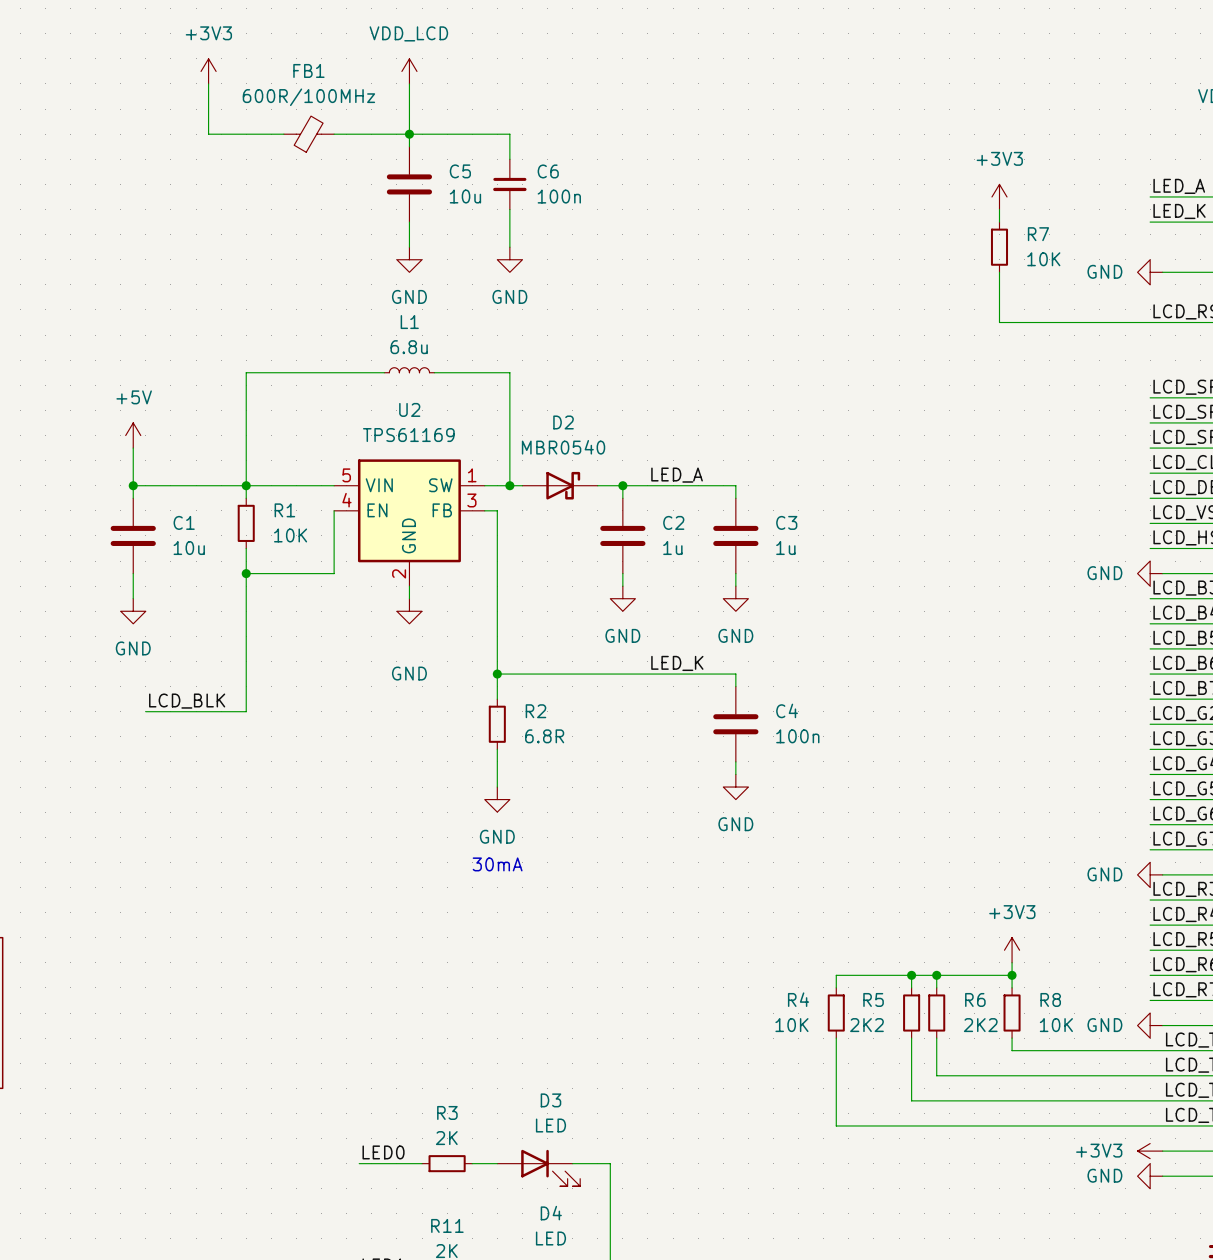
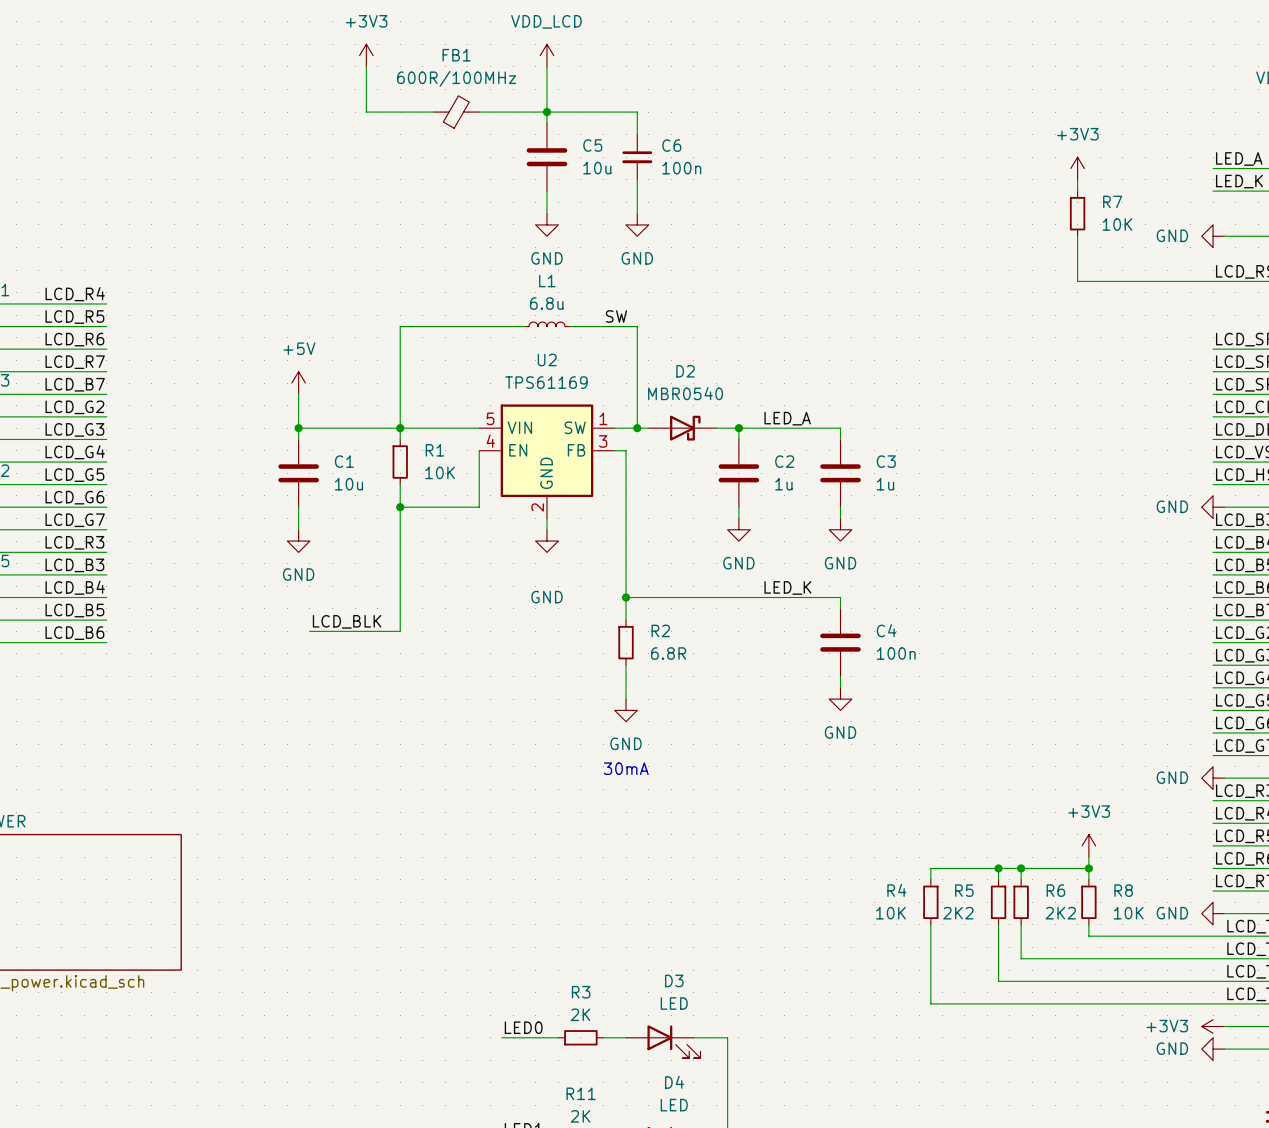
label: none -> SW (616, 316)

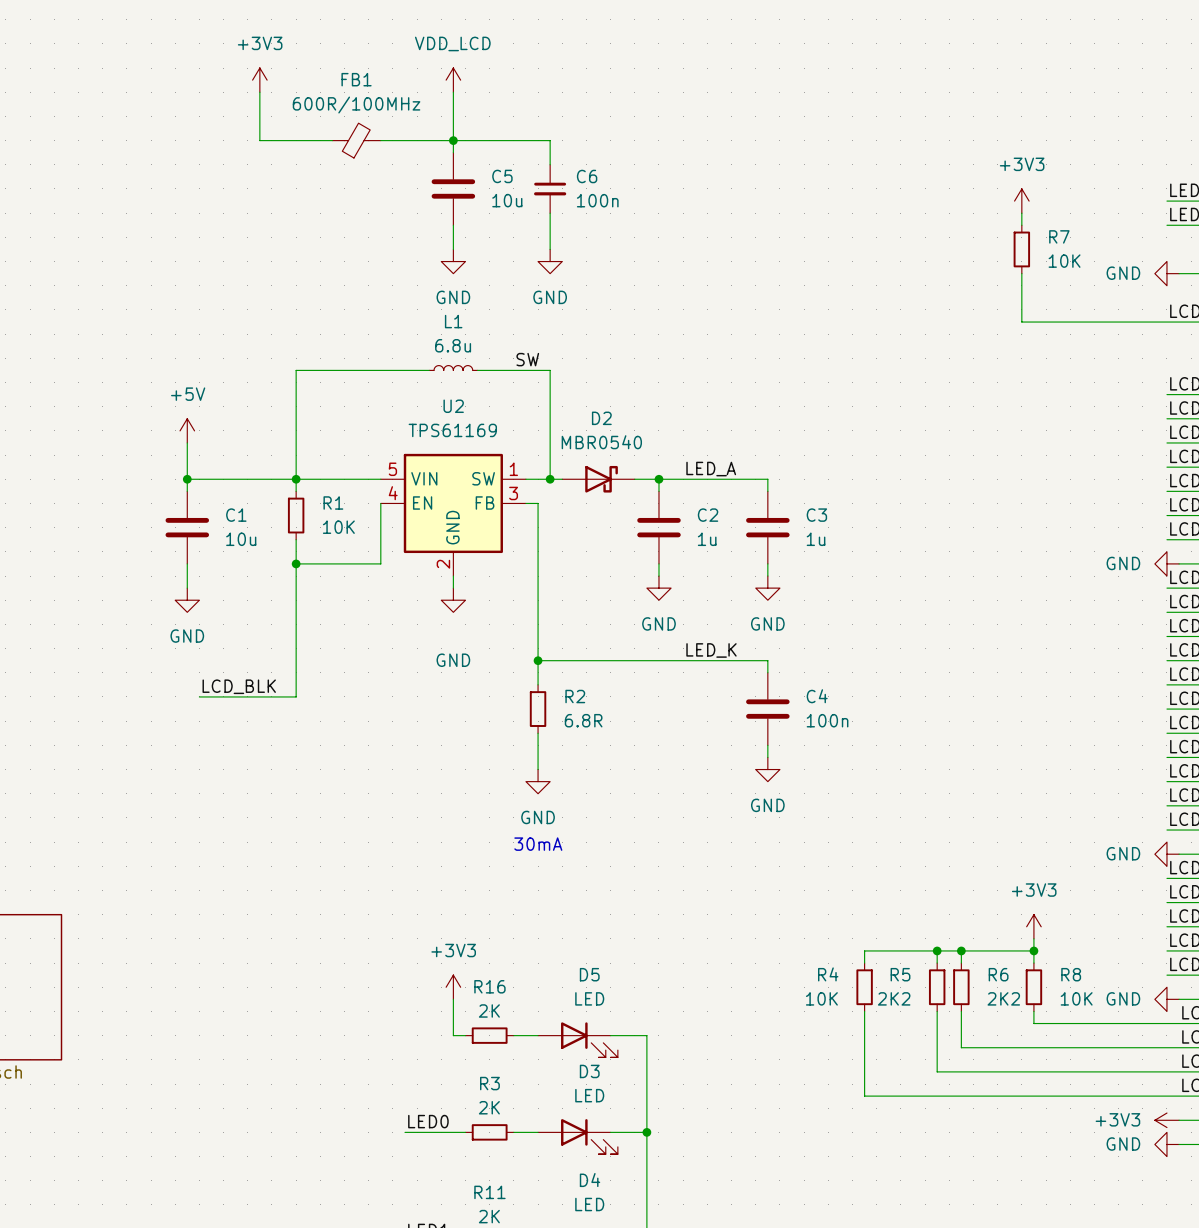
power symbol: none -> +3V3 (453, 987)
wire: none -> (453, 999) (453, 1035) (465, 1035)
R16: none -> 2K (489, 1035)
wire: none -> (513, 1035) (538, 1035)
wire: none -> (610, 1035) (646, 1035) (646, 1132)
D5: none -> LED (577, 1039)
junction: none -> (646, 1132)

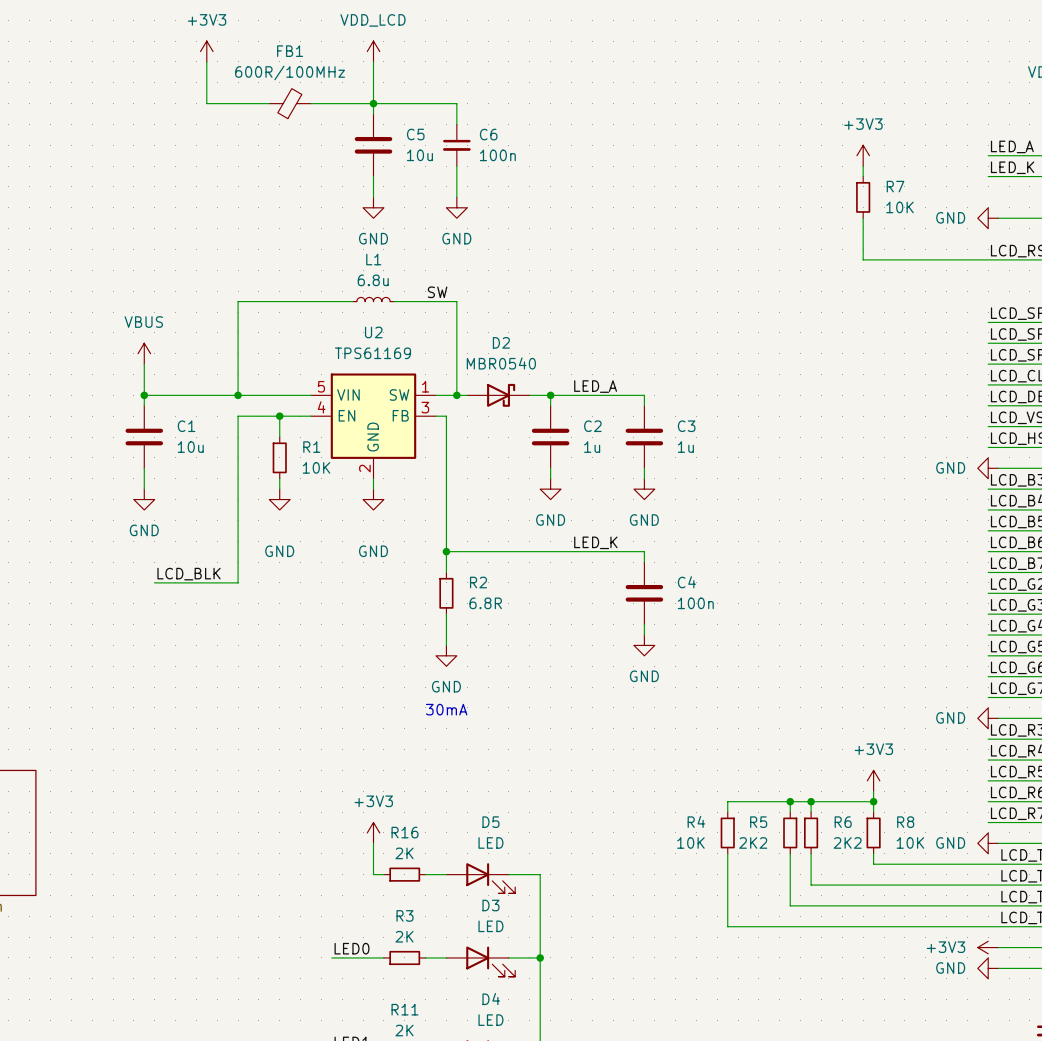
power symbol: +5V (187, 430) -> VBUS (144, 353)
wire: (296, 479) (296, 491) -> (279, 478) (279, 489)
wire: none -> (279, 416) (279, 437)
junction: none -> (279, 416)
wire: (380, 503) (380, 563) (296, 563) -> (310, 416) (238, 416) (238, 447)
R1 position: (296, 515) -> (279, 457)
junction: (296, 563) -> none
power symbol: none -> GND (279, 499)

